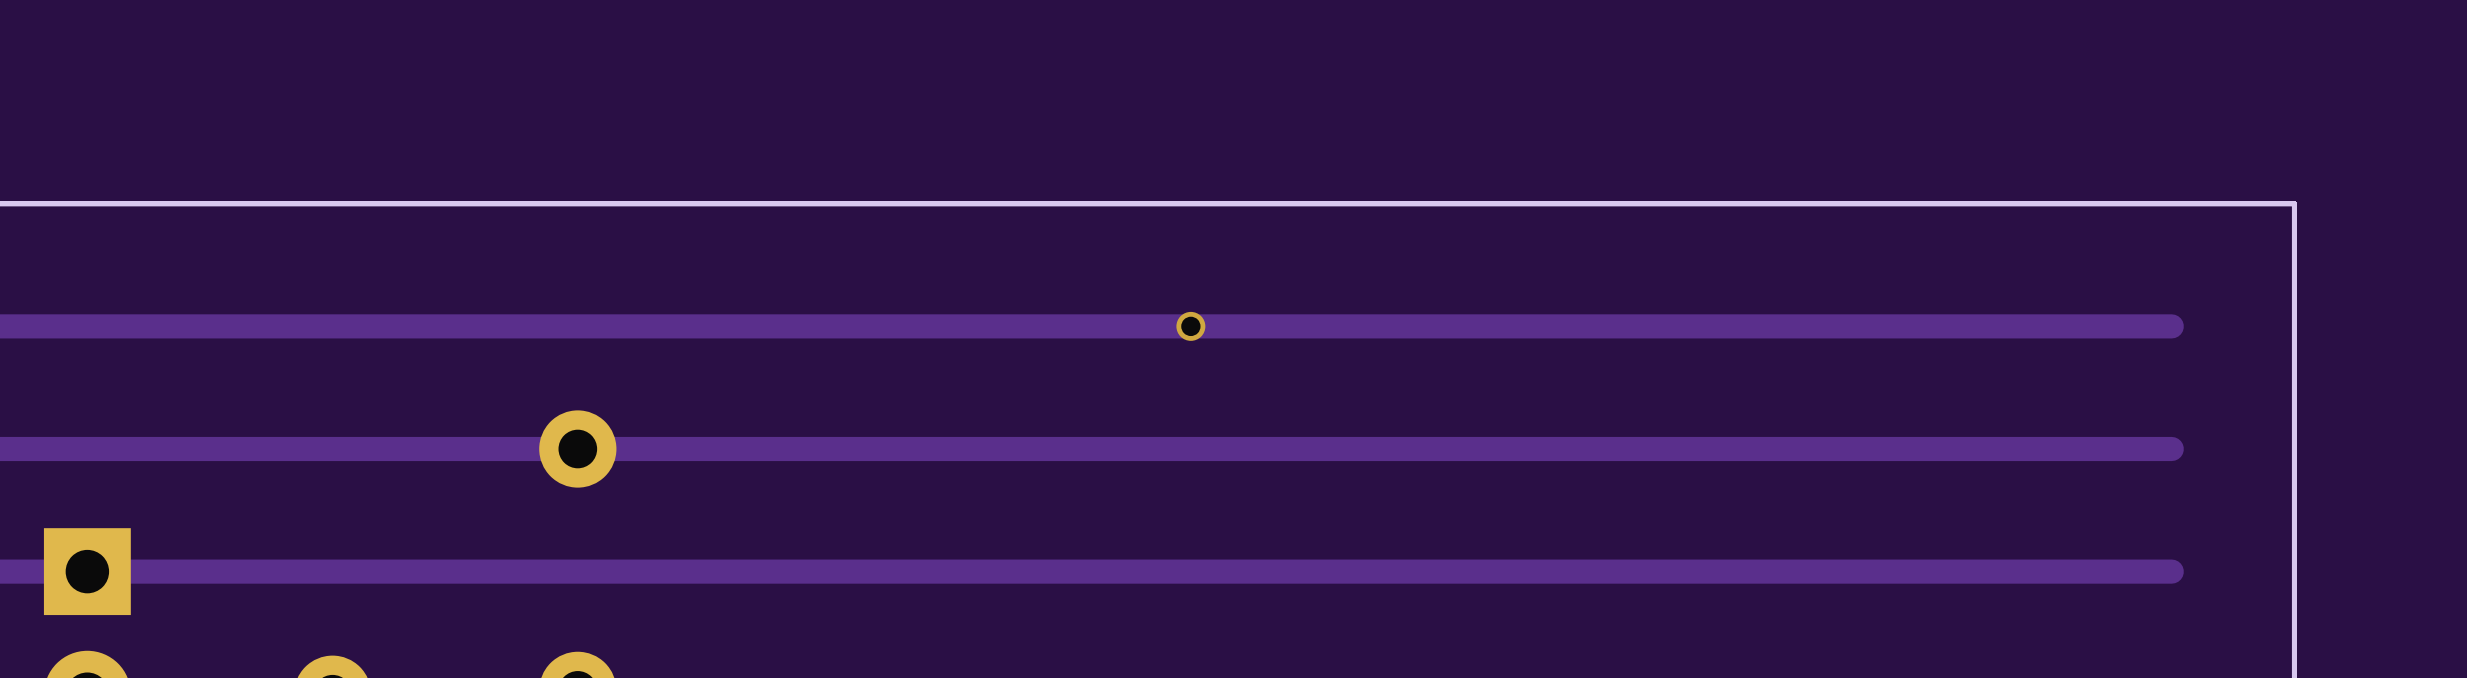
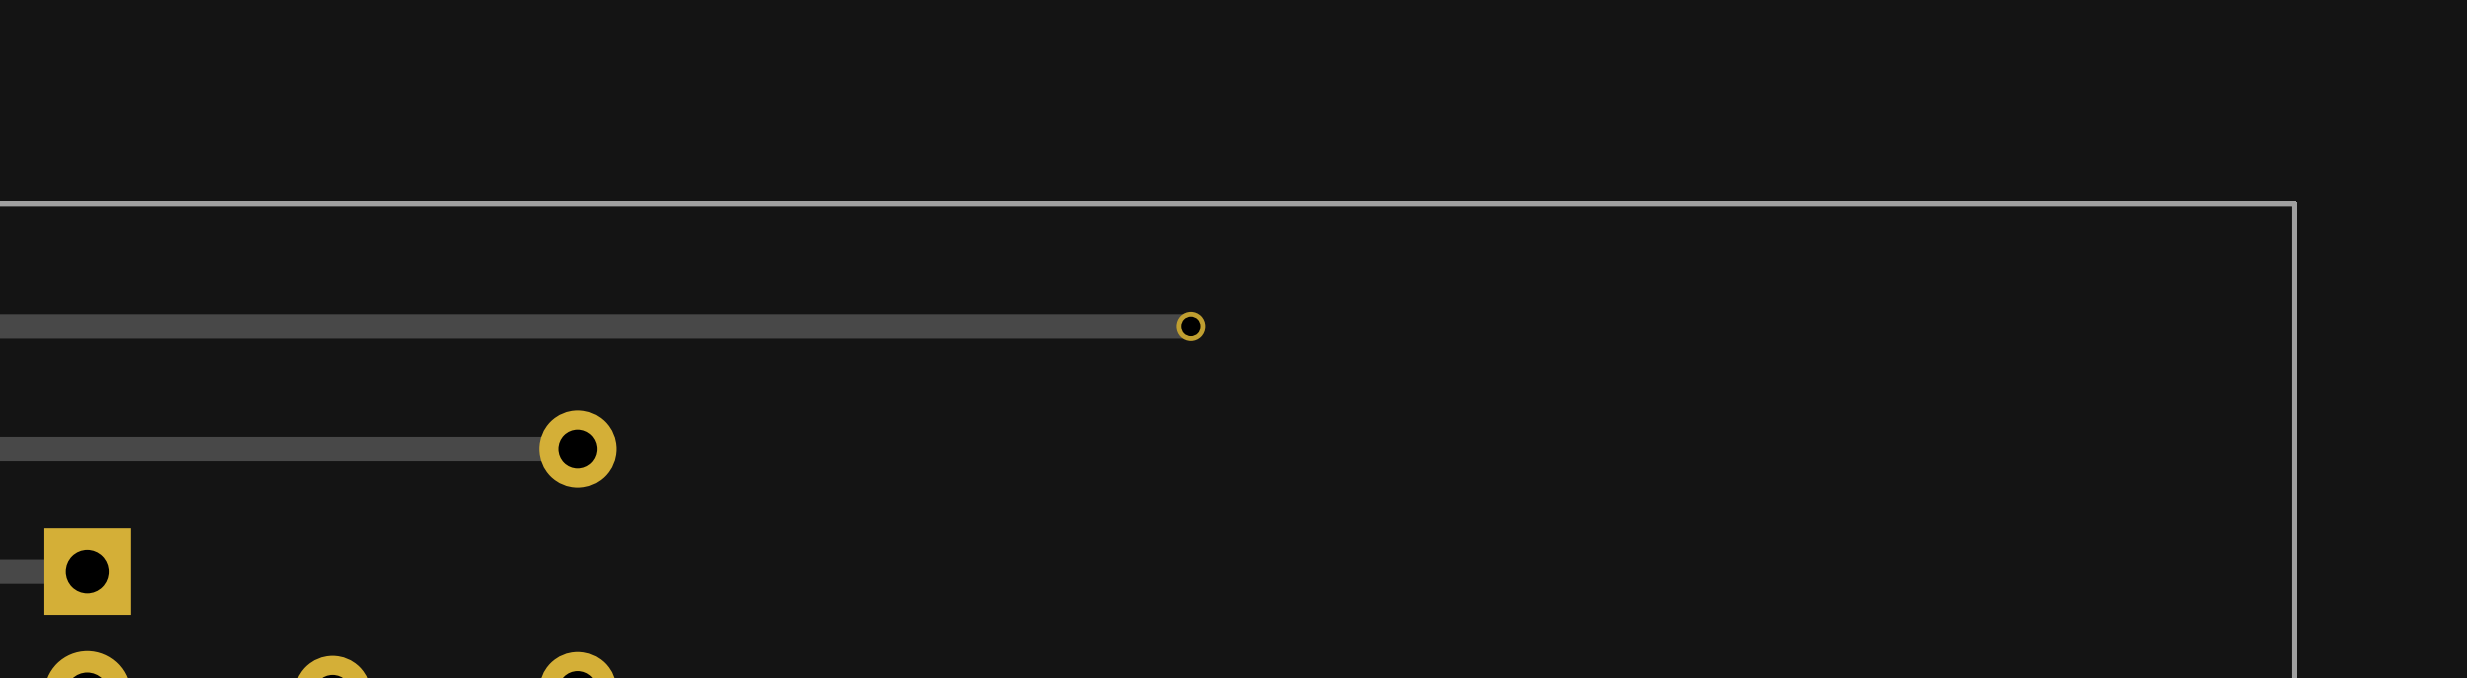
track: (2171, 326) (1190, 326) -> none
track: (2171, 448) (577, 448) -> none
track: (2171, 571) (87, 571) -> none

